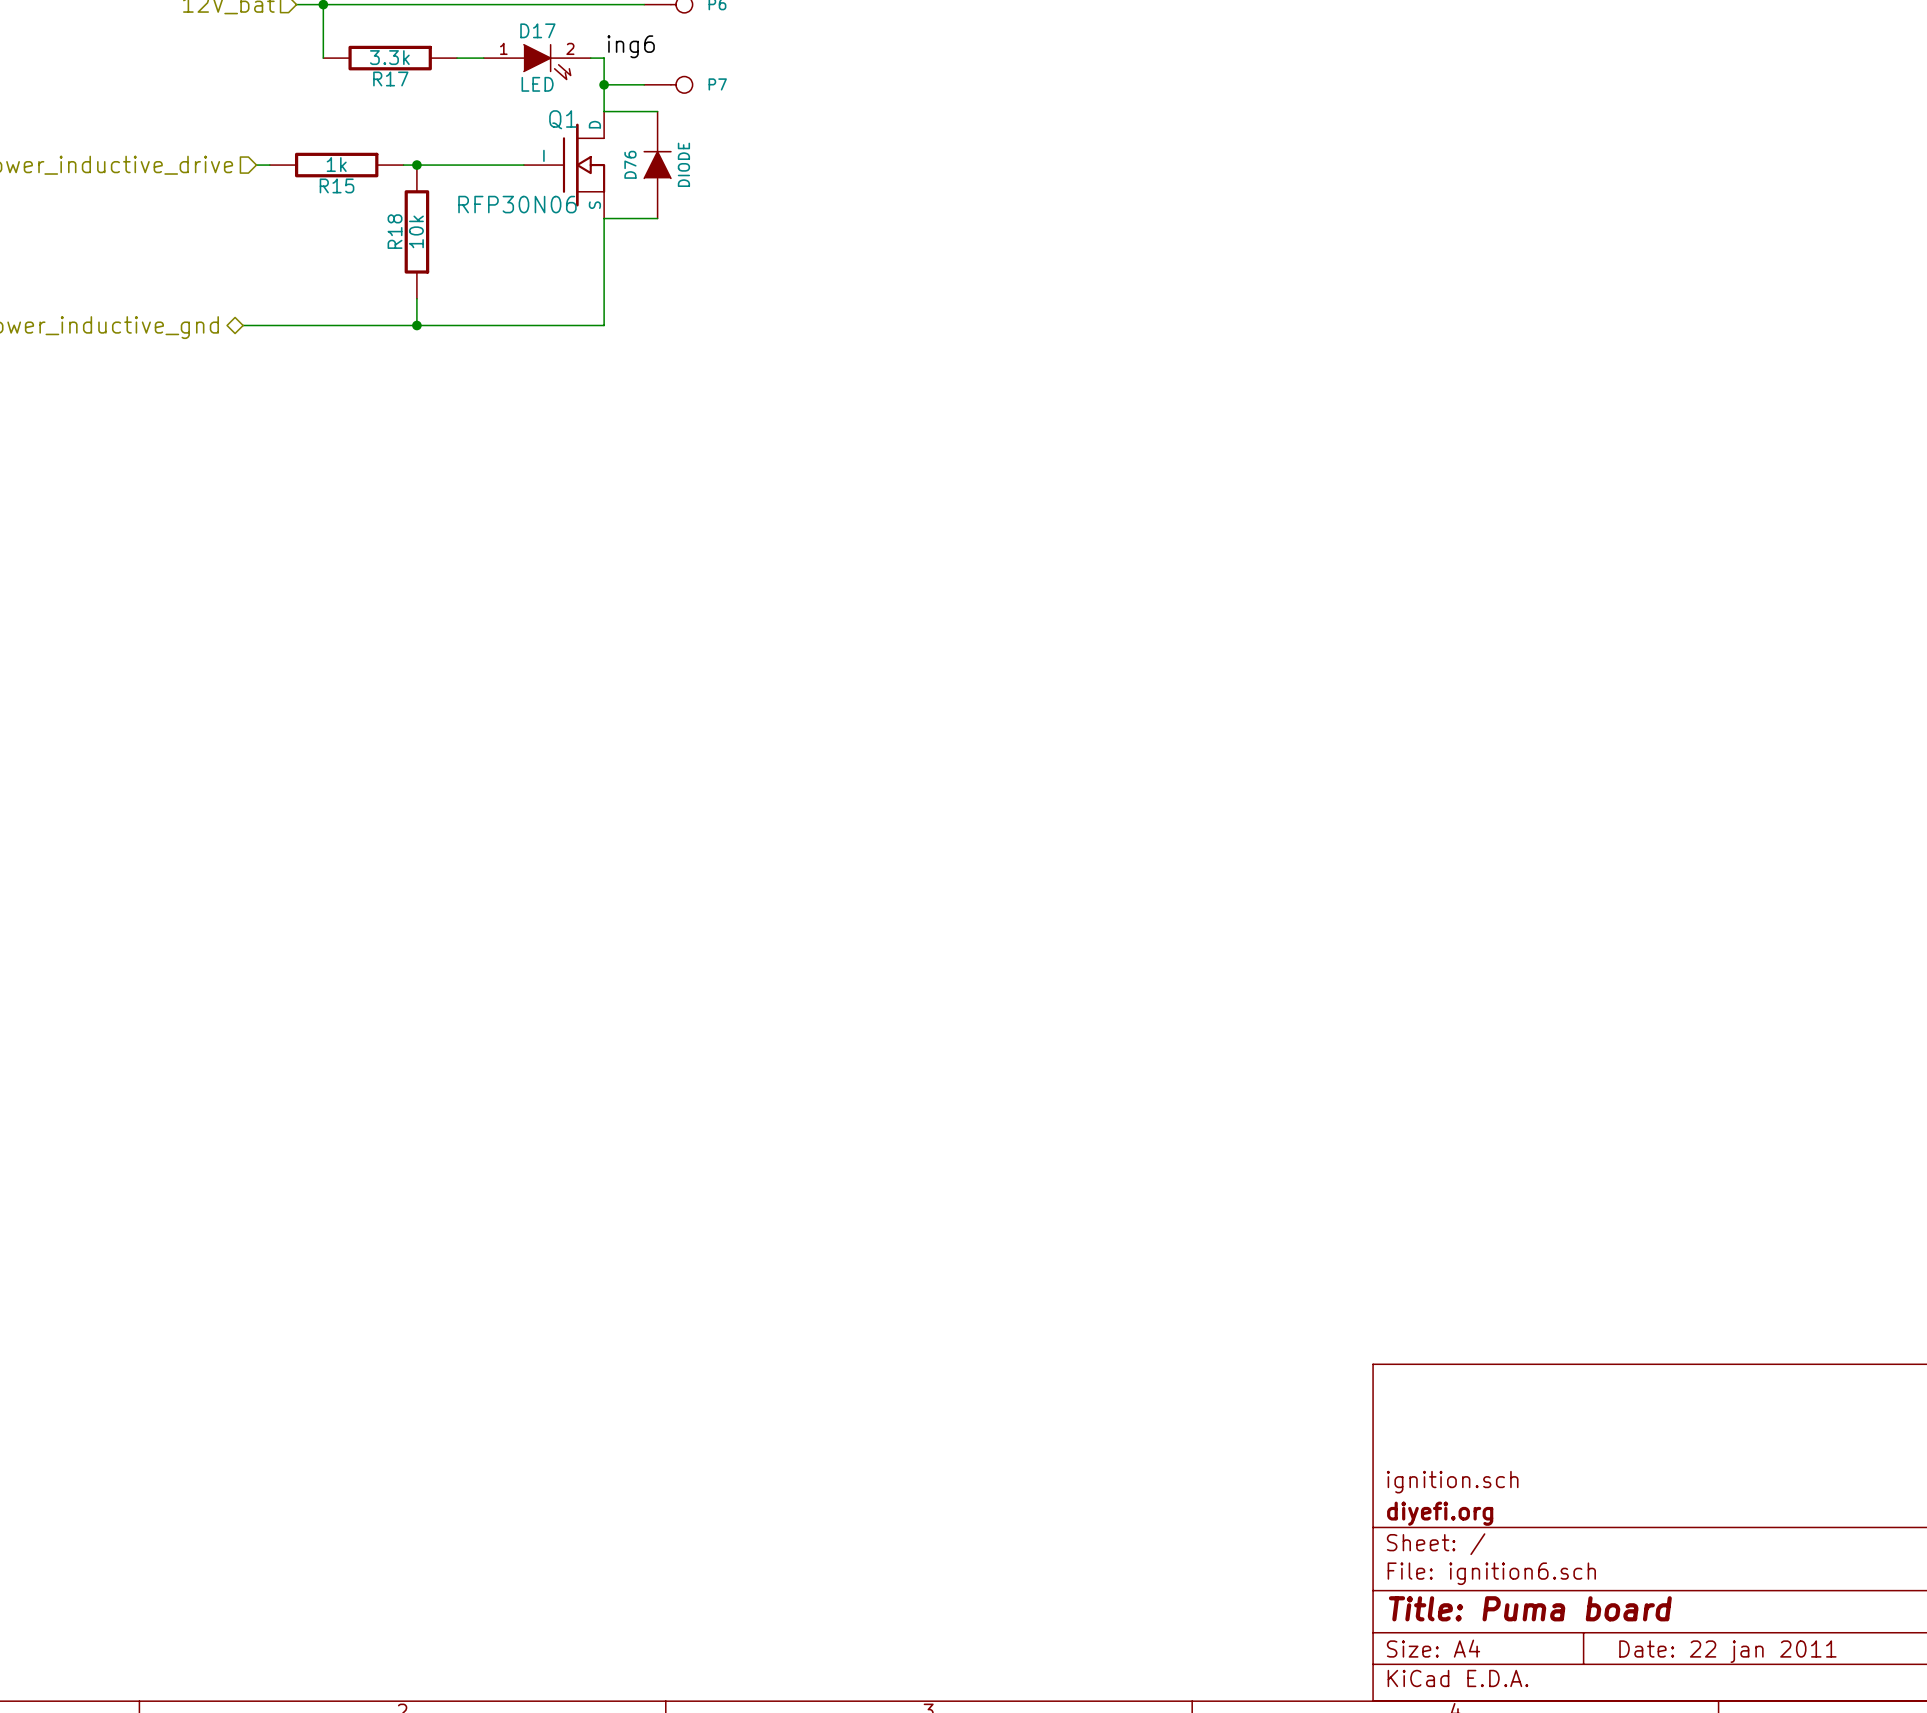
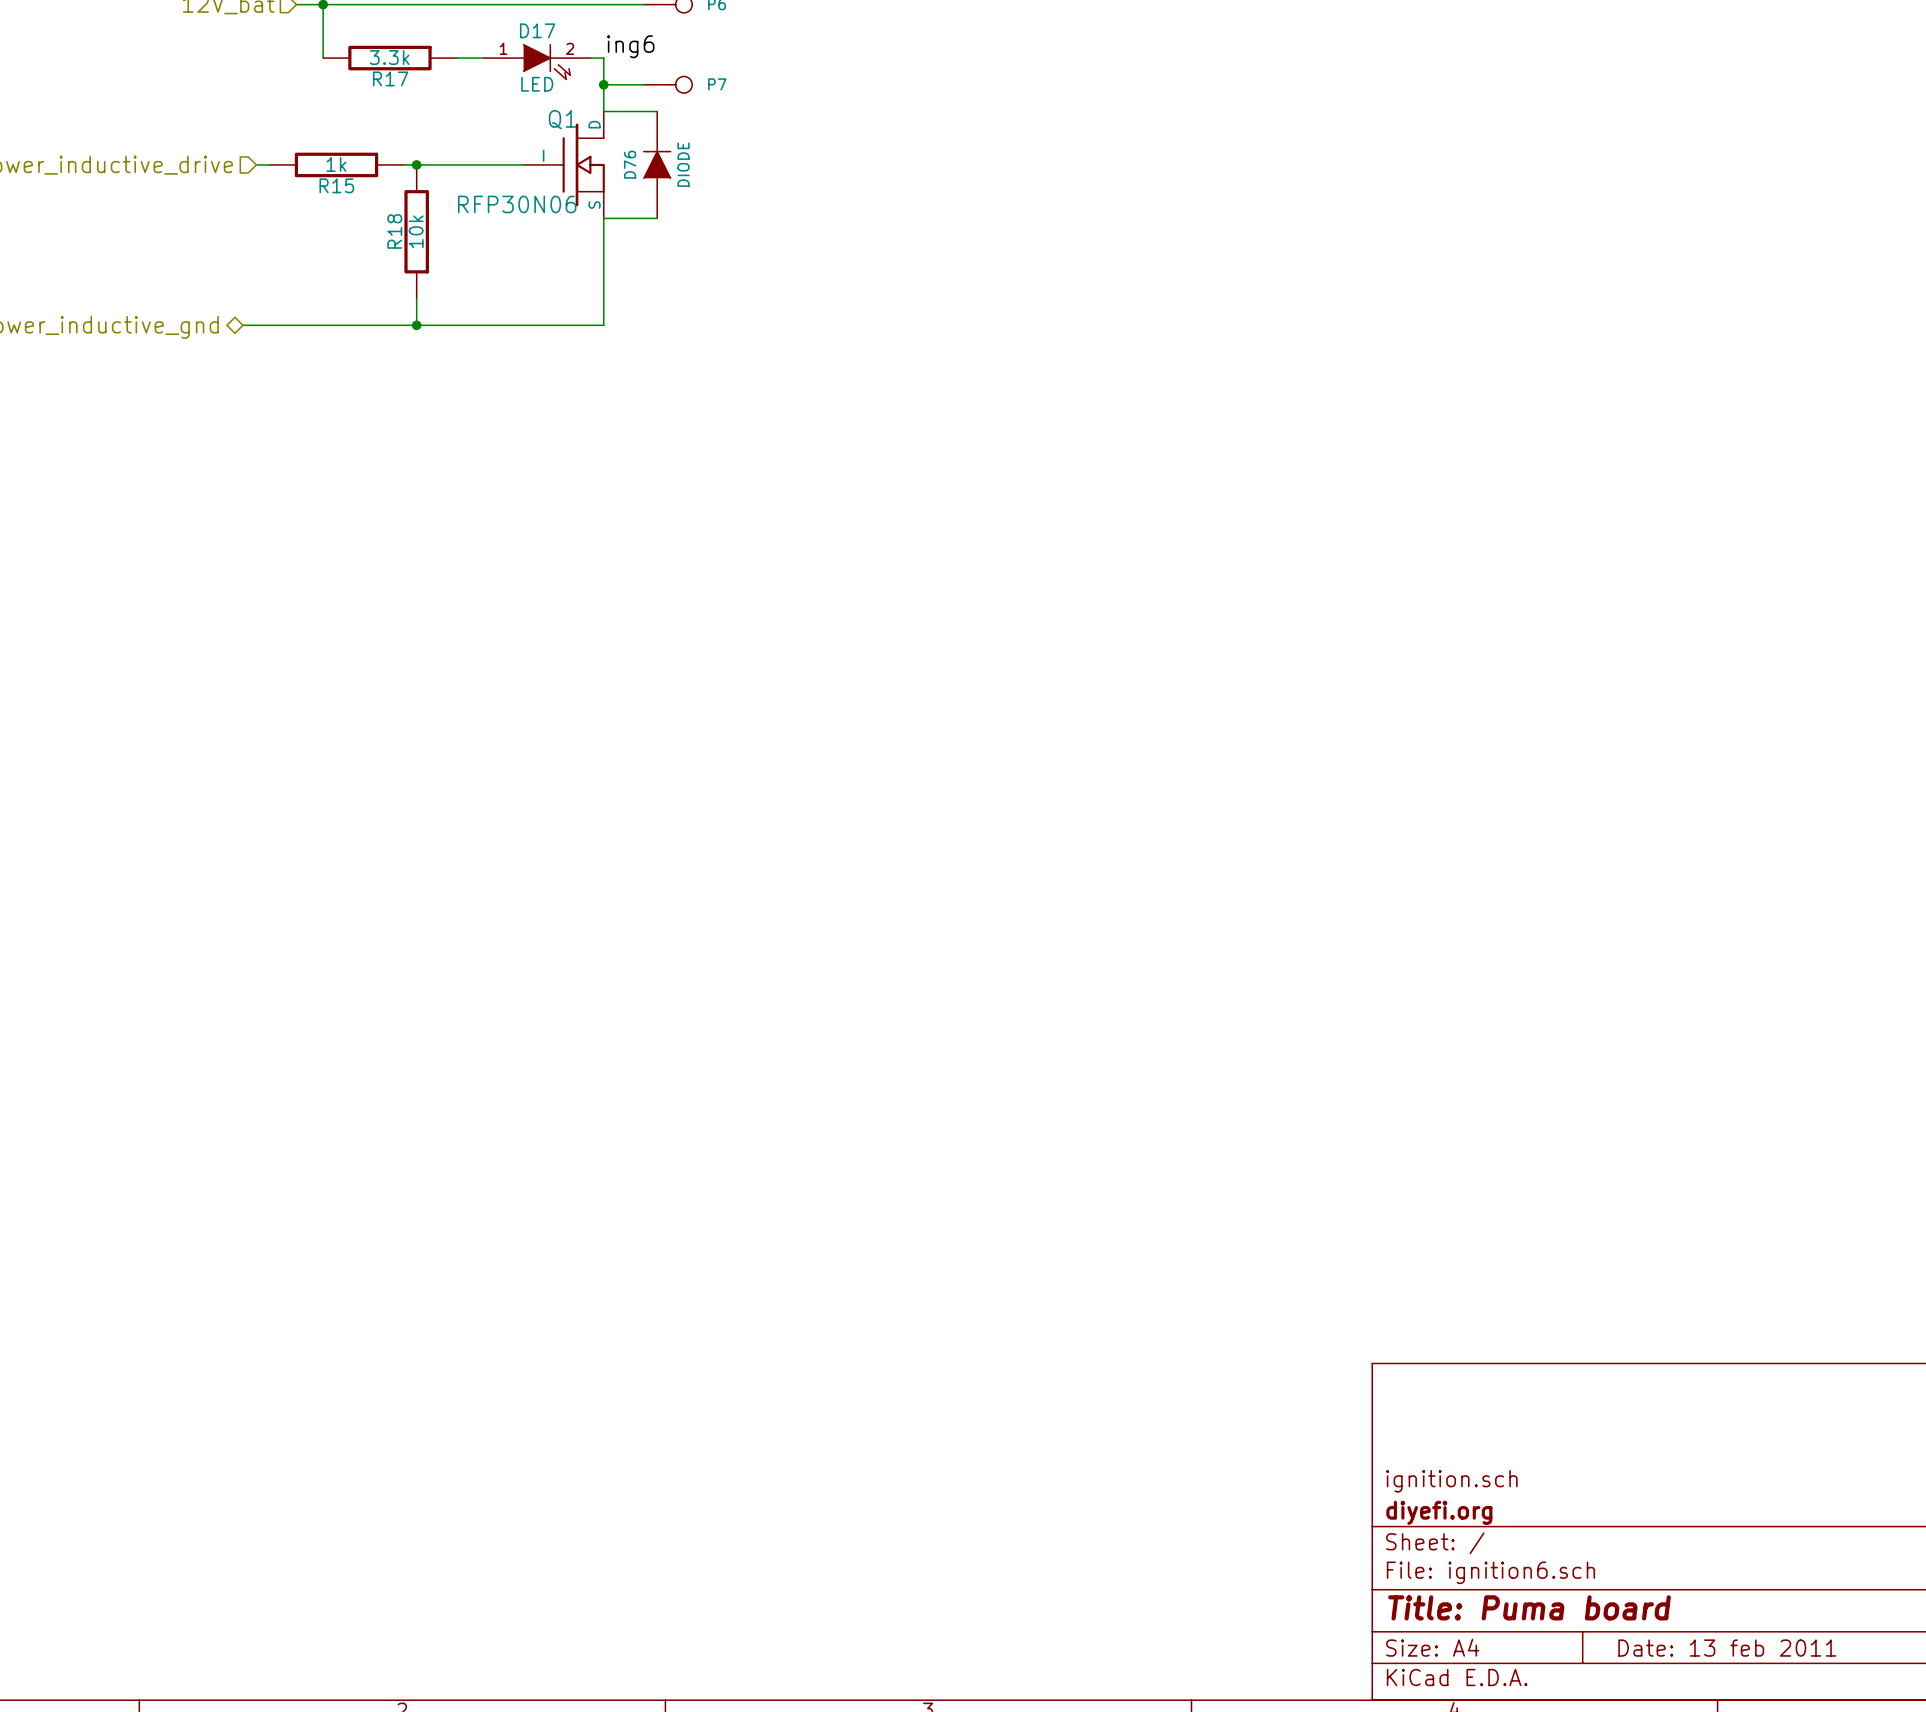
title block: Date: 22 jan 2011 (1727, 1651) -> Date: 13 feb 2011 (1727, 1648)

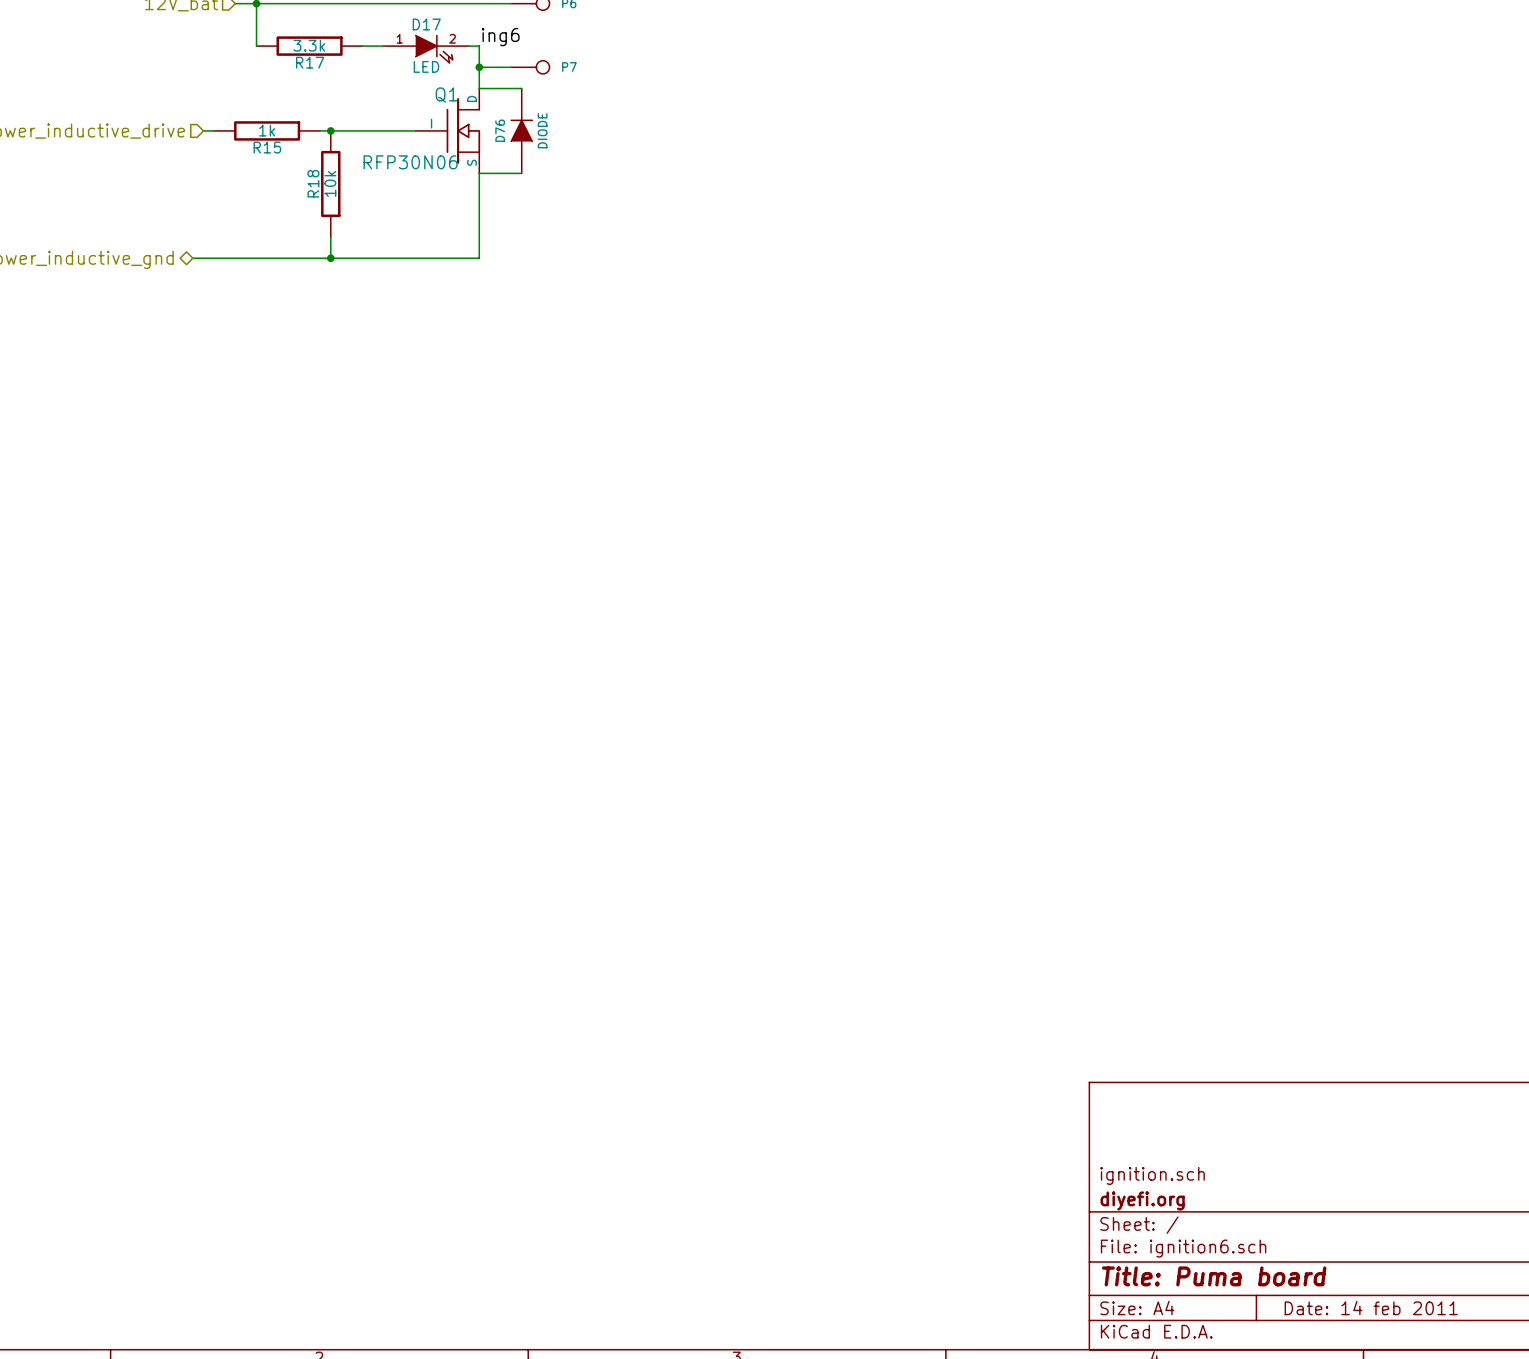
title block: Date: 13 feb 2011 (1727, 1648) -> Date: 14 feb 2011 (1371, 1308)

